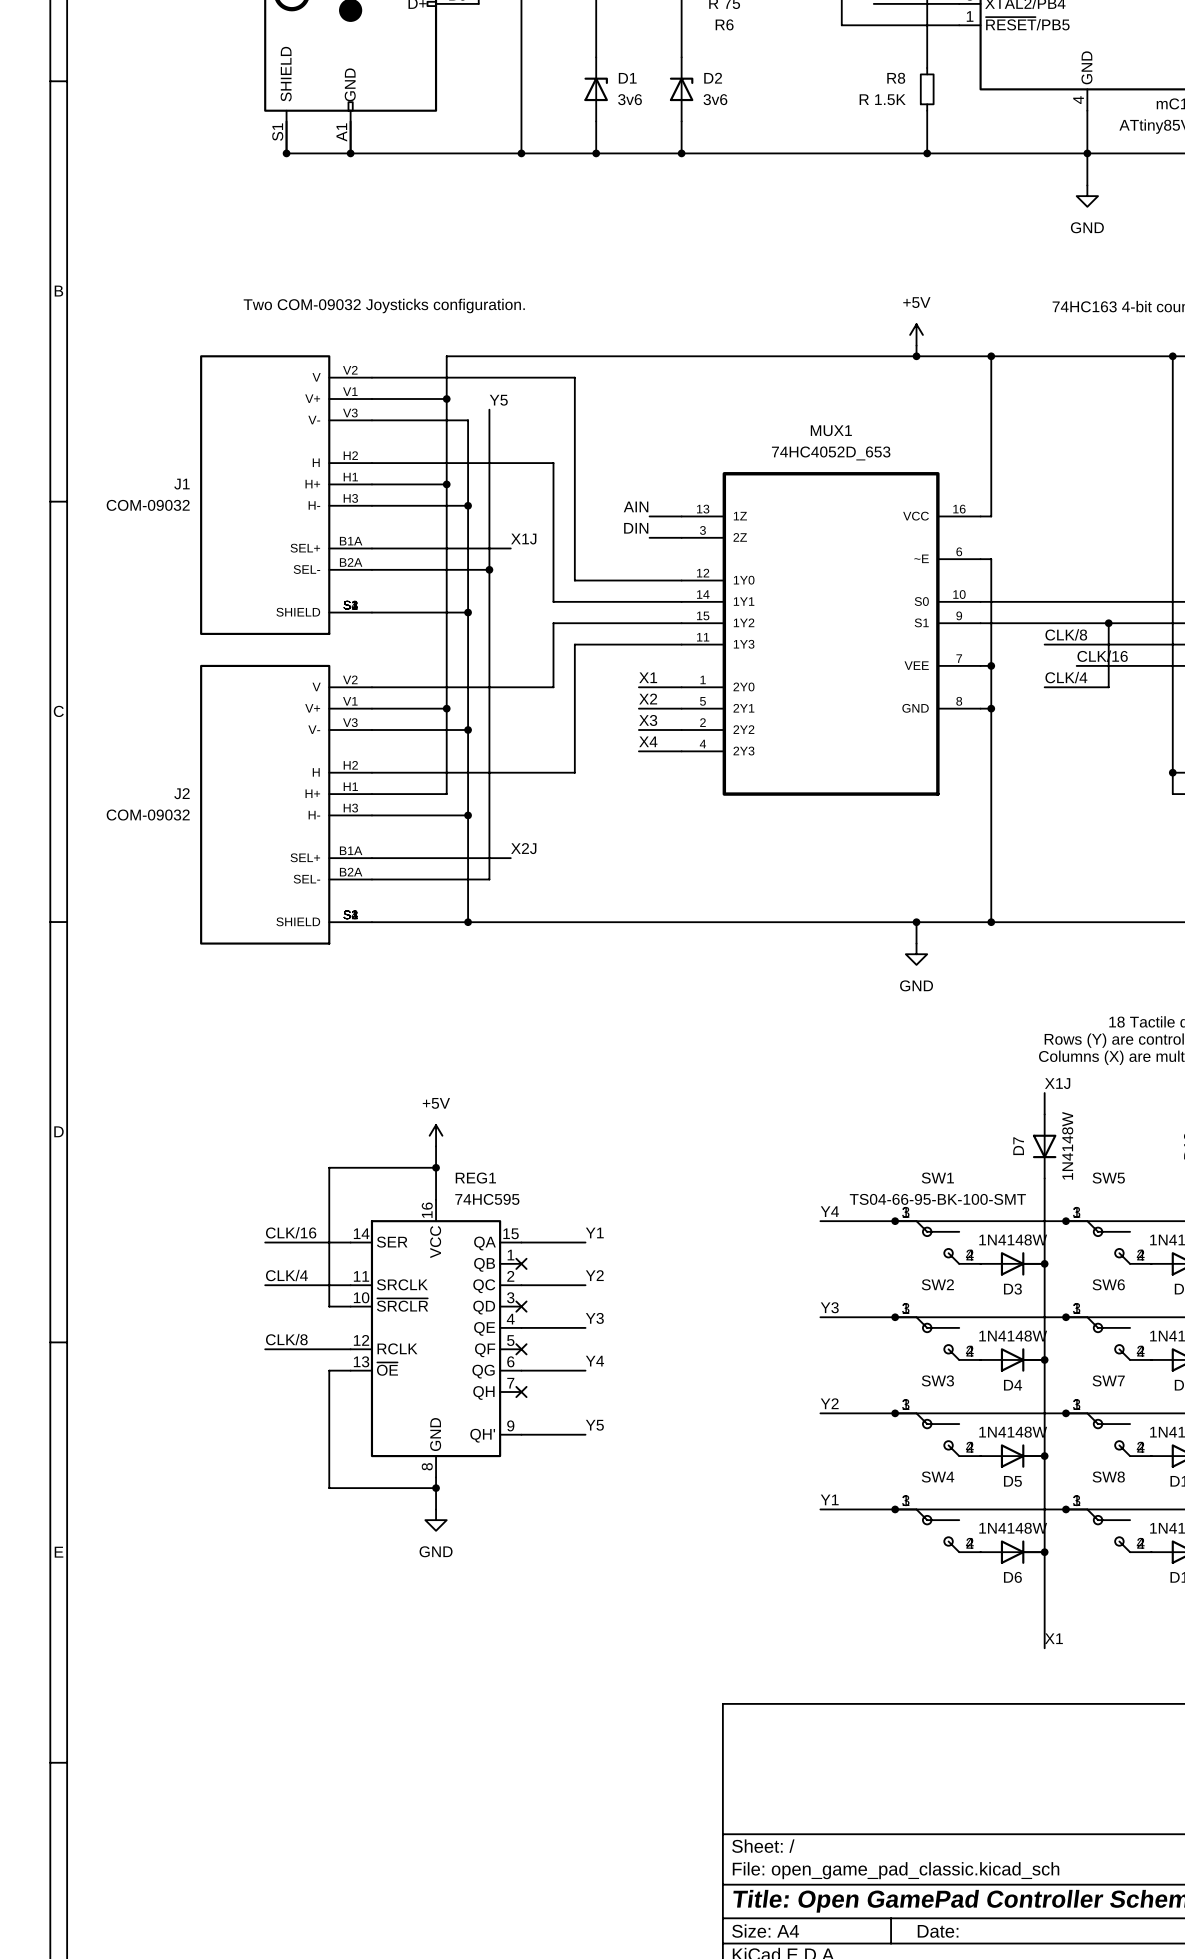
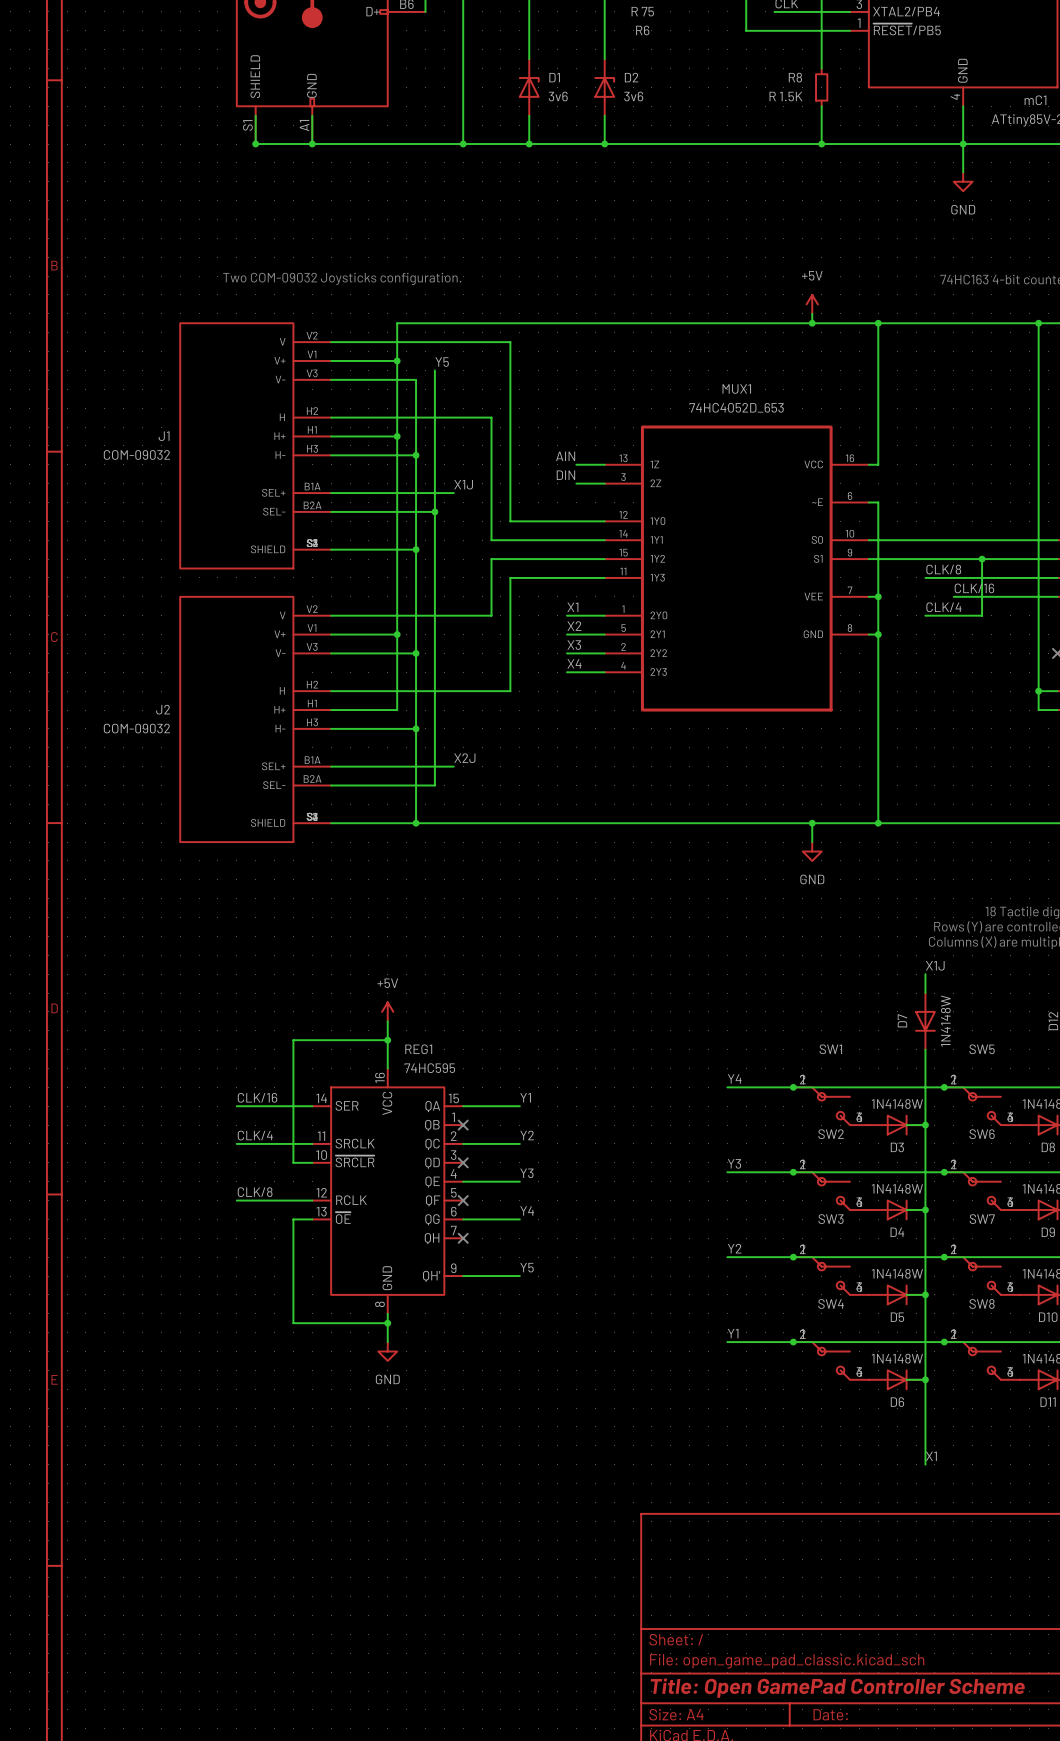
SW1 value: TS04-66-95-BK-100-SMT (937, 1199) -> none
SW1 symbol: [895, 1221, 981, 1264] -> [793, 1087, 869, 1126]
SW5 symbol: [1066, 1221, 1152, 1264] -> [944, 1087, 1020, 1126]
SW2 symbol: [895, 1317, 981, 1360] -> [793, 1172, 869, 1210]
SW6 symbol: [1066, 1317, 1152, 1360] -> [944, 1172, 1020, 1210]
SW3 symbol: [895, 1413, 981, 1457] -> [793, 1257, 869, 1295]
SW7 symbol: [1066, 1413, 1152, 1457] -> [944, 1257, 1020, 1295]
SW4 symbol: [895, 1509, 981, 1553] -> [793, 1342, 869, 1380]
SW8 symbol: [1066, 1509, 1152, 1553] -> [944, 1342, 1020, 1380]

